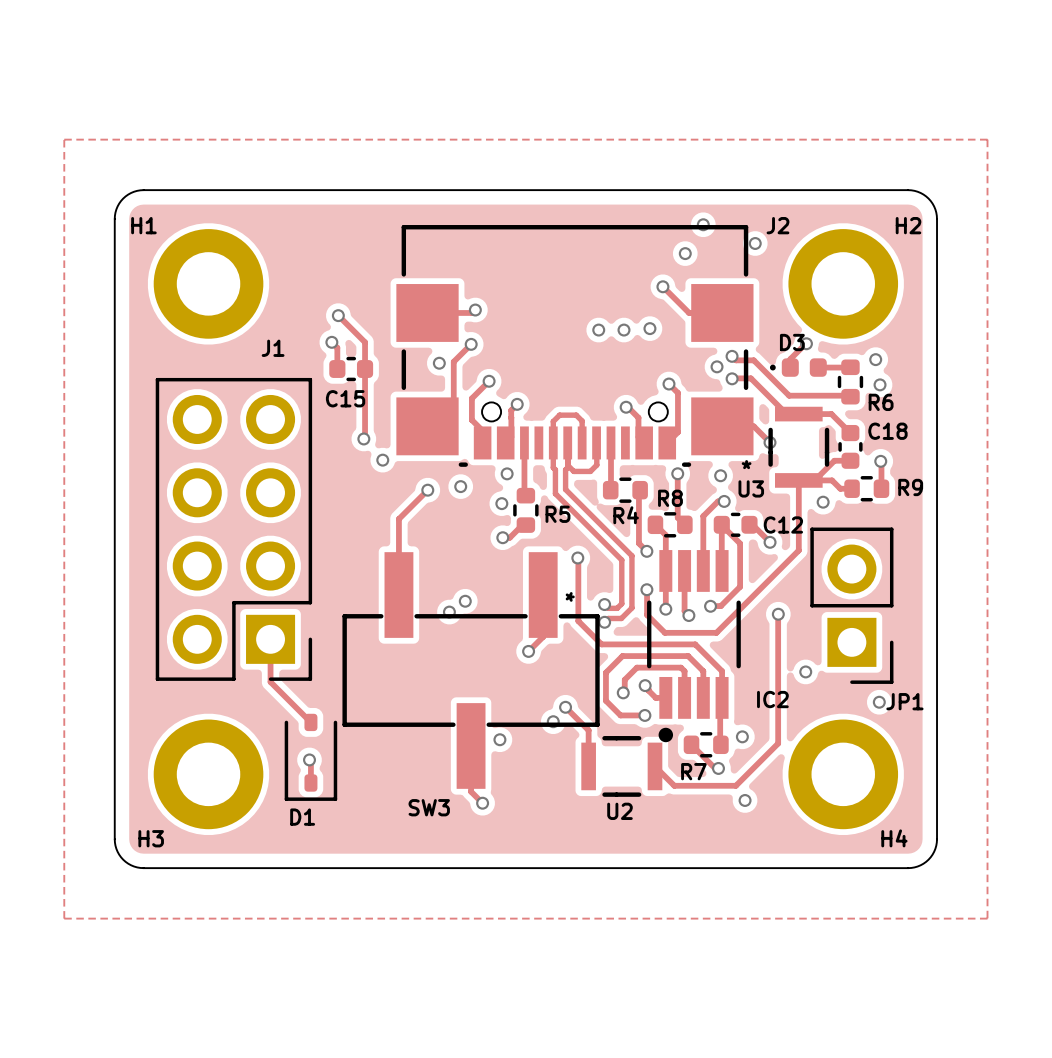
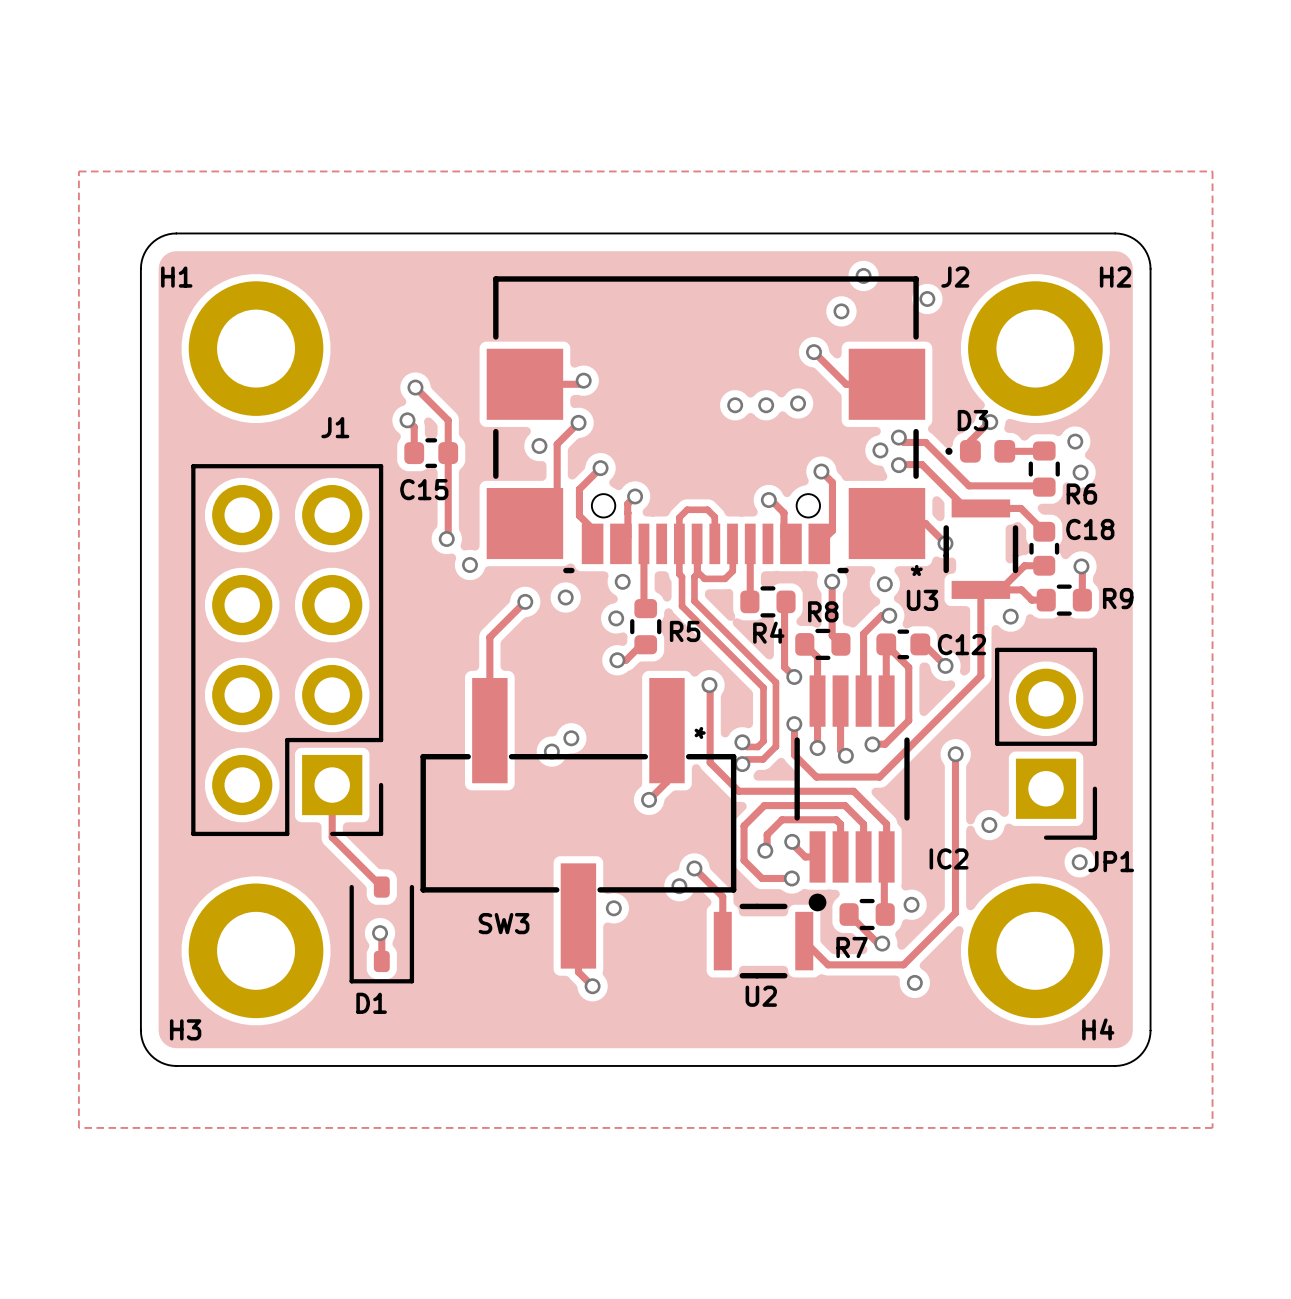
SW3 name position: SW3 (429, 807) -> SW3 (504, 923)

